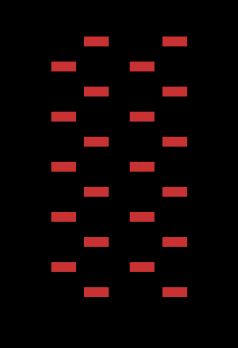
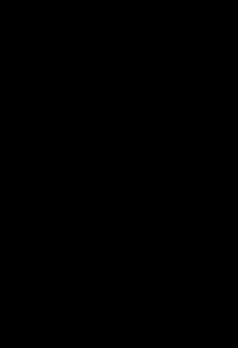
part: (80, 166) -> none
part: (158, 166) -> none

